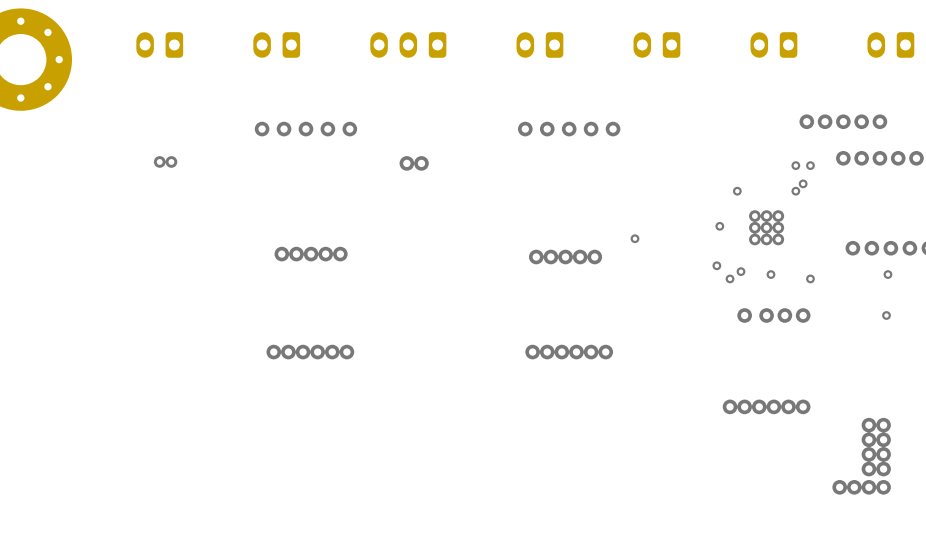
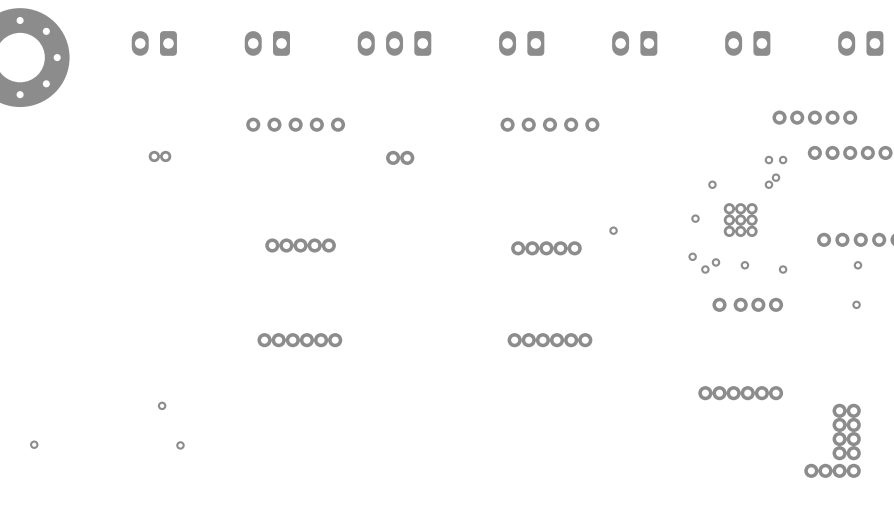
via: none -> (162, 405)
via: none -> (34, 444)
via: none -> (180, 445)

